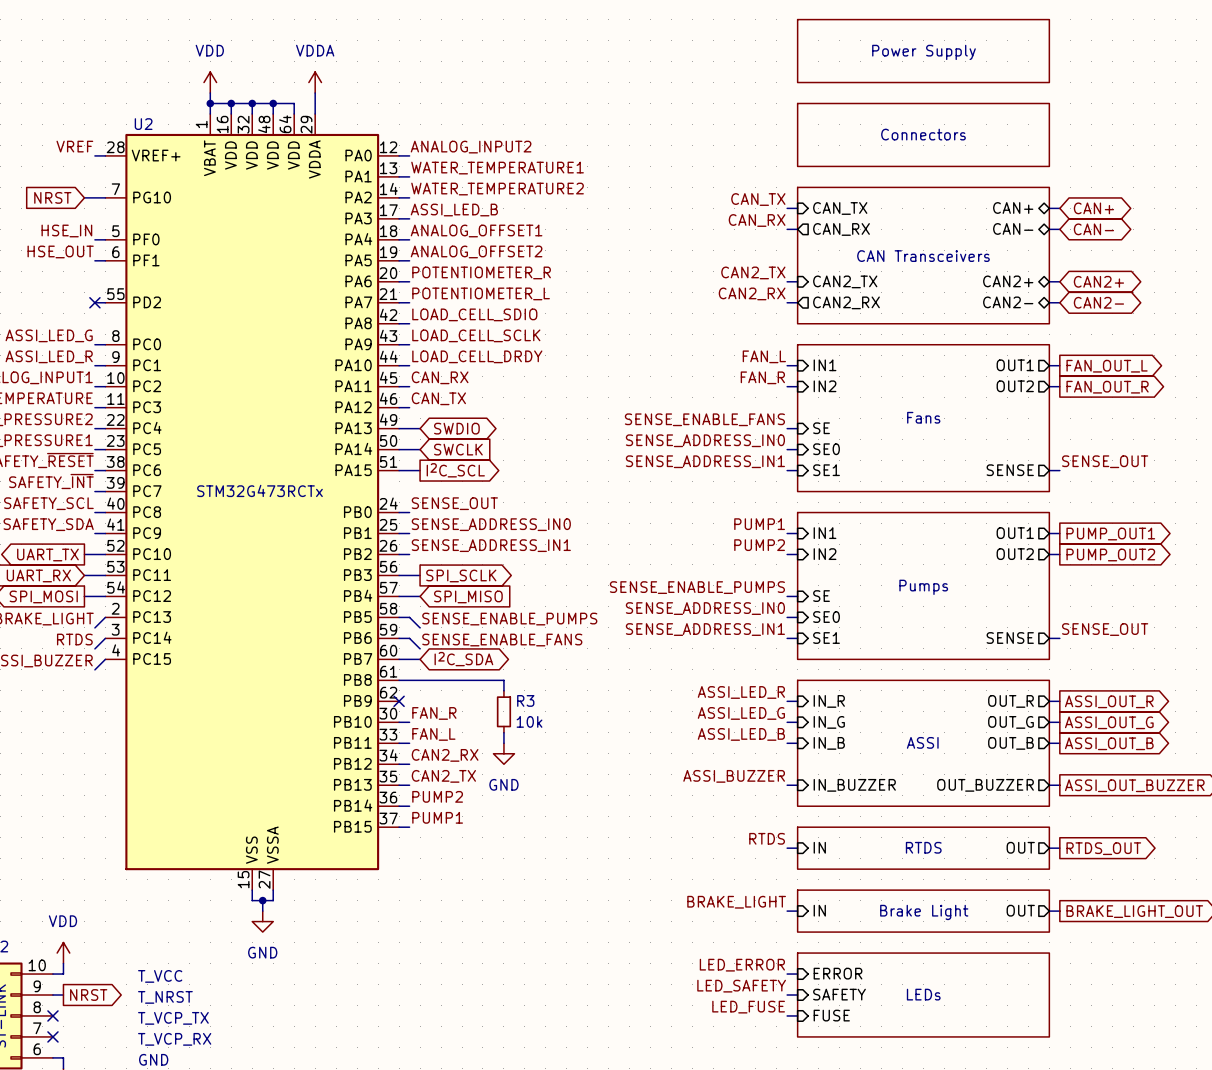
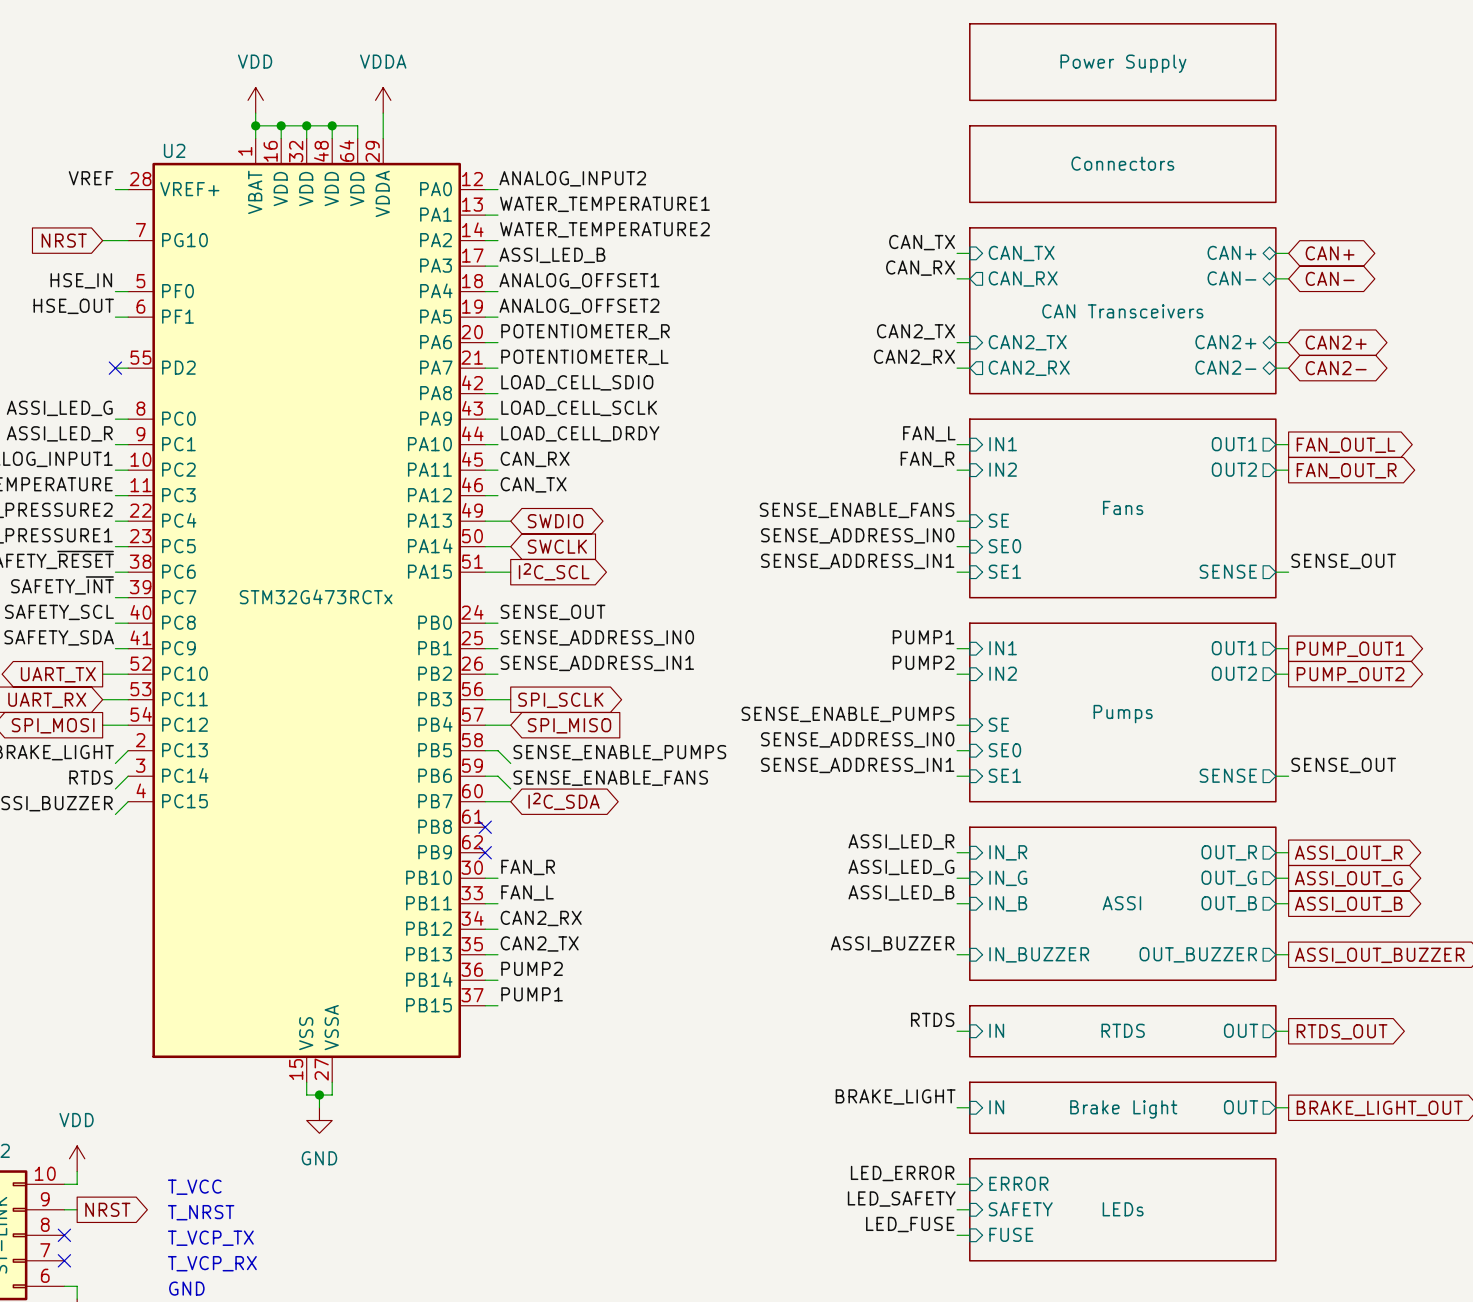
wire: (399, 680) (503, 680) (503, 690) -> none
no-connect mark: none -> (485, 827)
R3: 10k (503, 711) -> none
wire: (503, 732) (503, 743) -> none
power symbol: GND (503, 753) -> none

